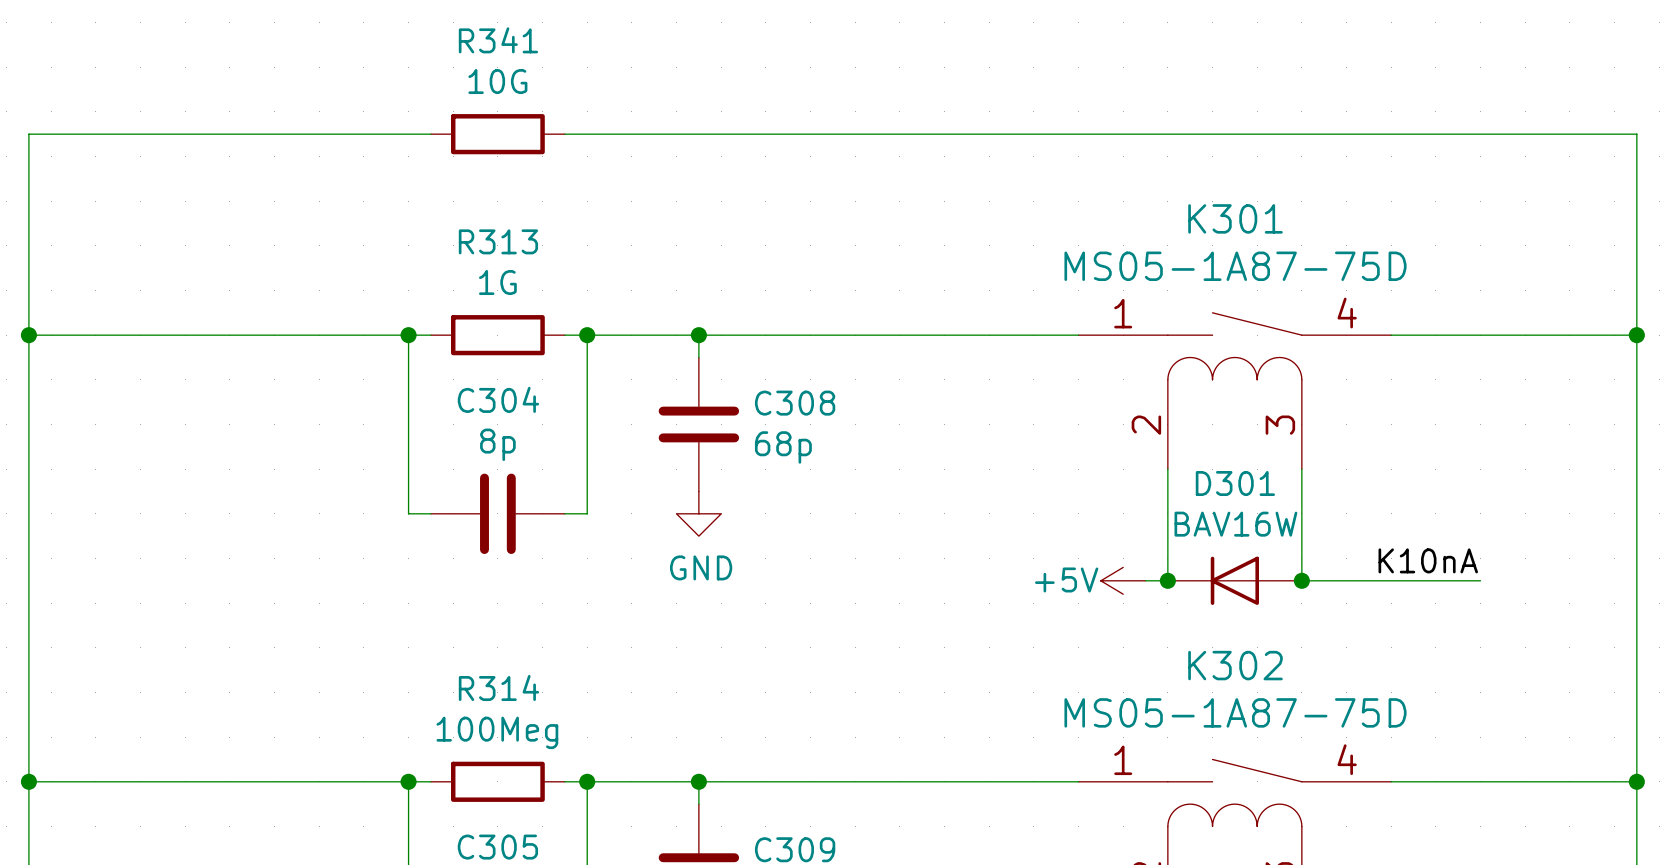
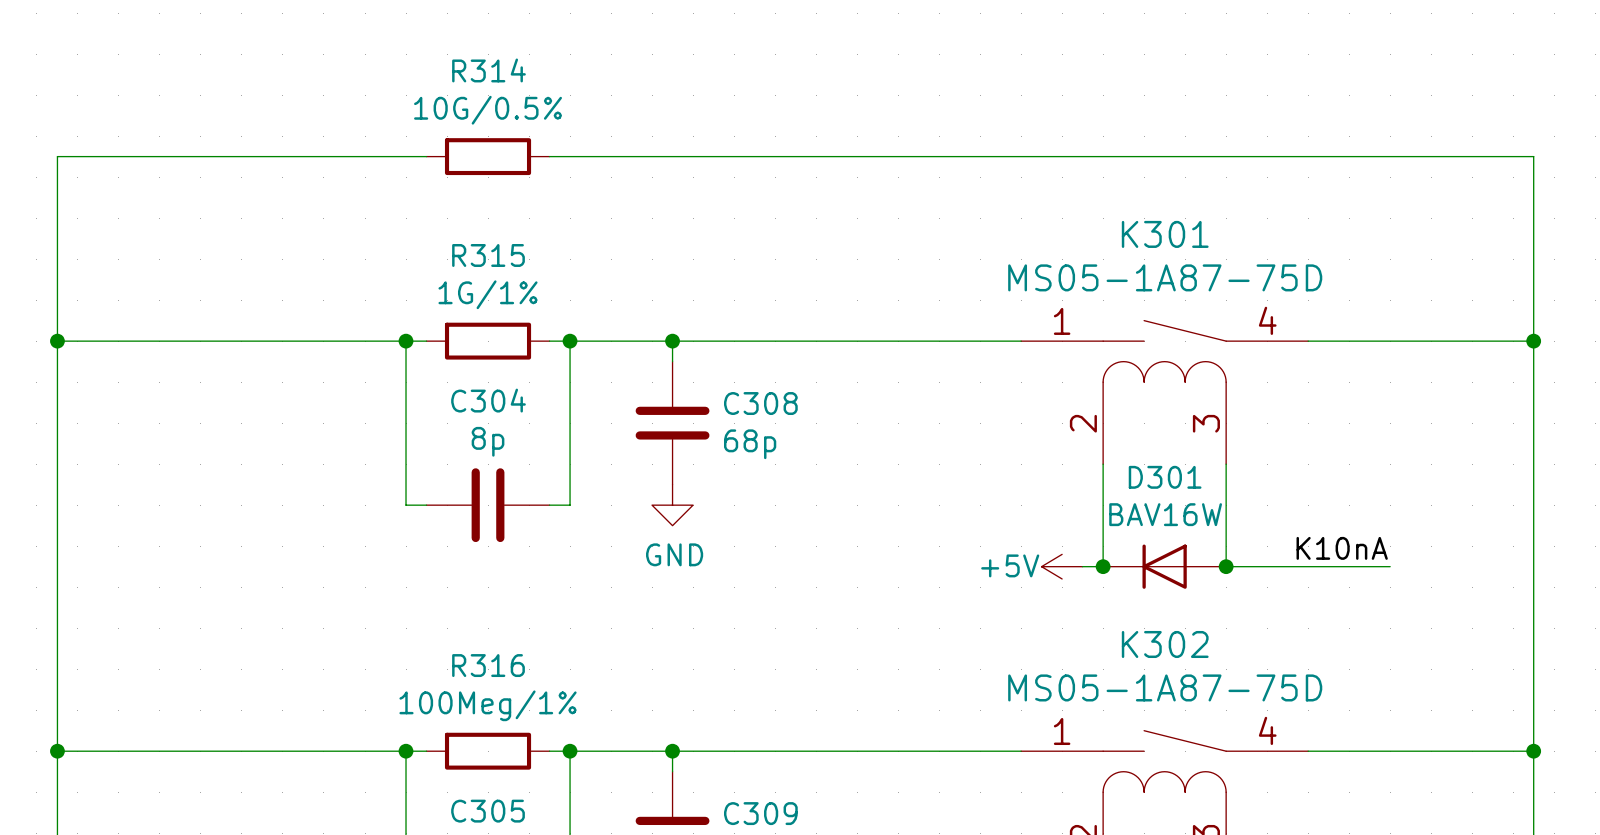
R341 name: R341 (498, 40) -> R314 (488, 70)
R341 value: 10G (497, 81) -> 10G/0.5% (488, 110)
R313 name: R313 (498, 241) -> R315 (488, 255)
R313 value: 1G (497, 282) -> 1G/1% (488, 294)
R314 name: R314 (498, 687) -> R316 (488, 665)
R314 value: 100Meg (497, 732) -> 100Meg/1% (488, 705)

